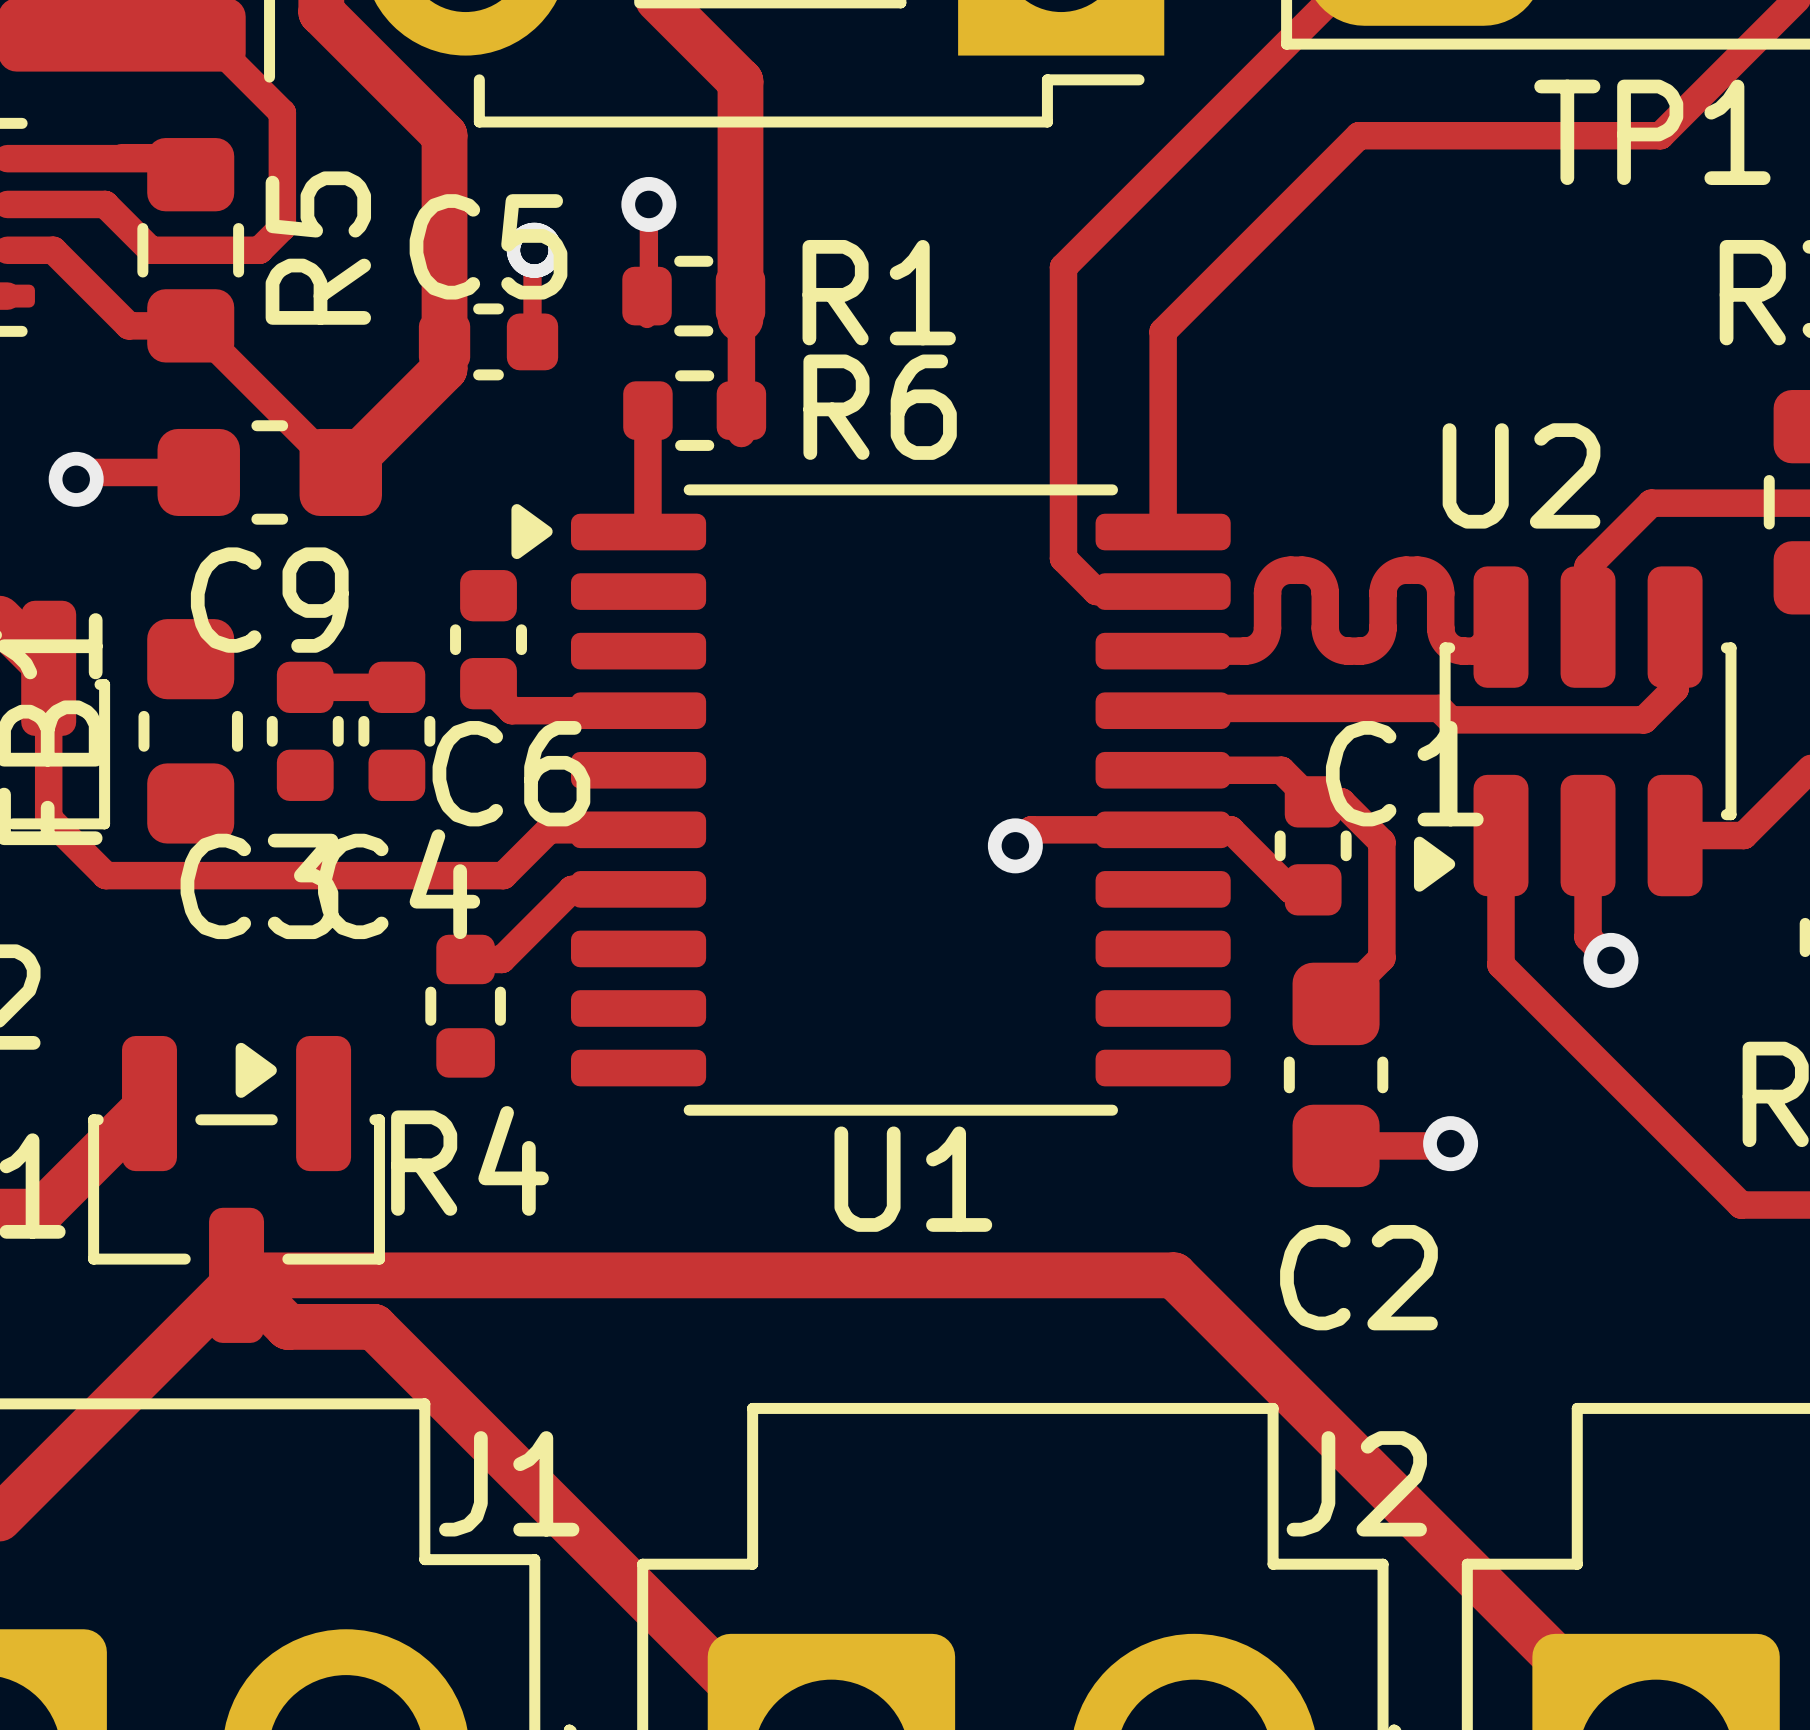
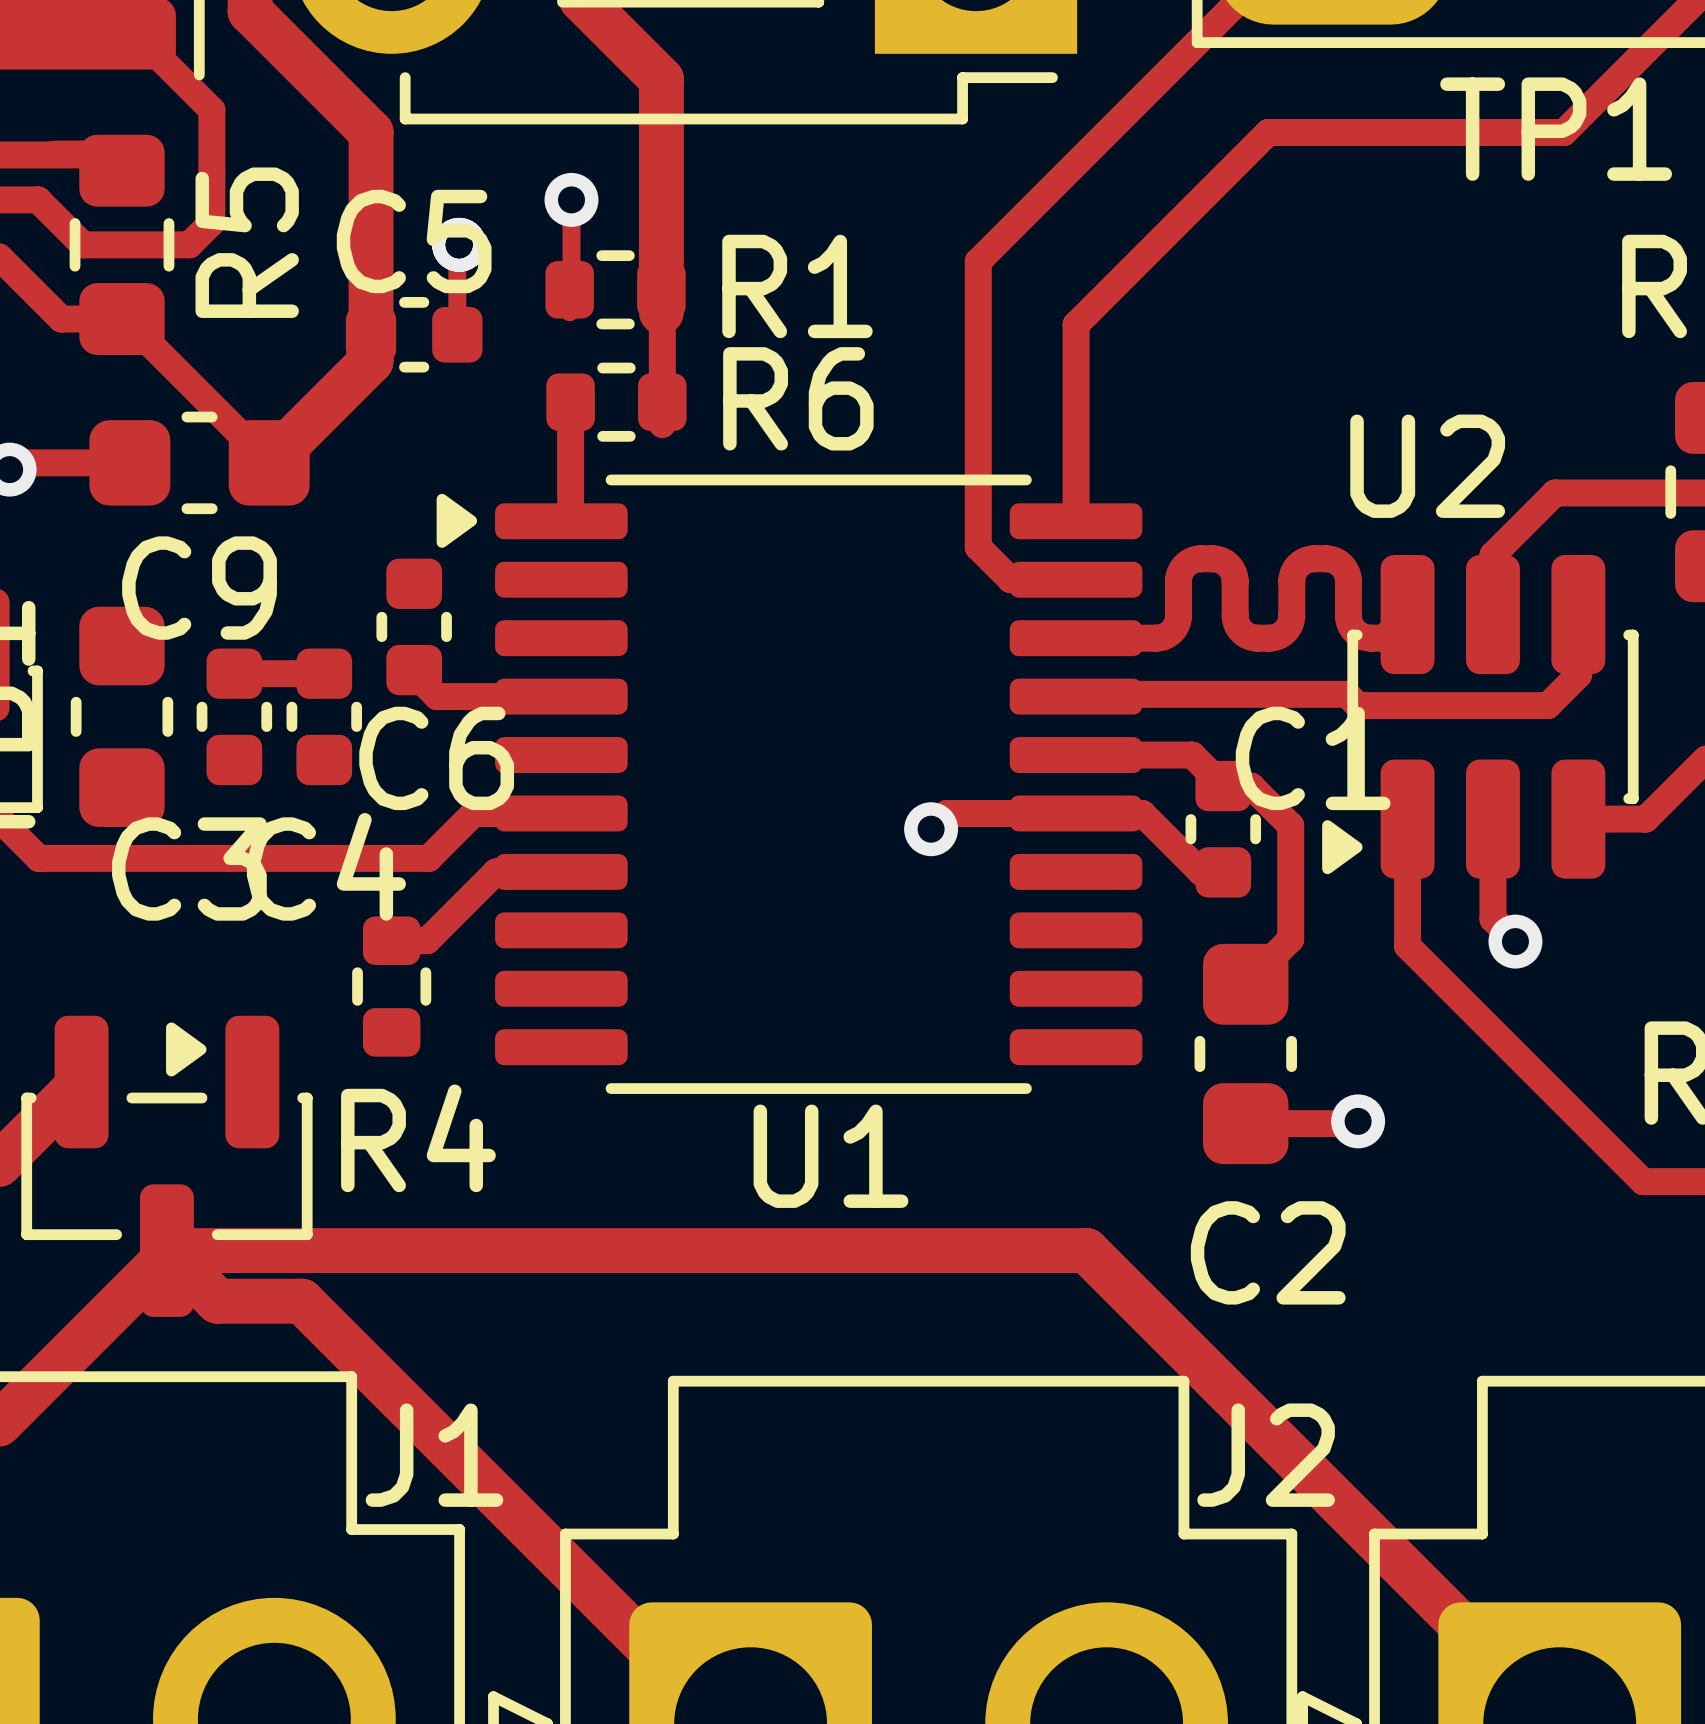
R4 name position: R4 (469, 1160) -> R4 (418, 1138)

